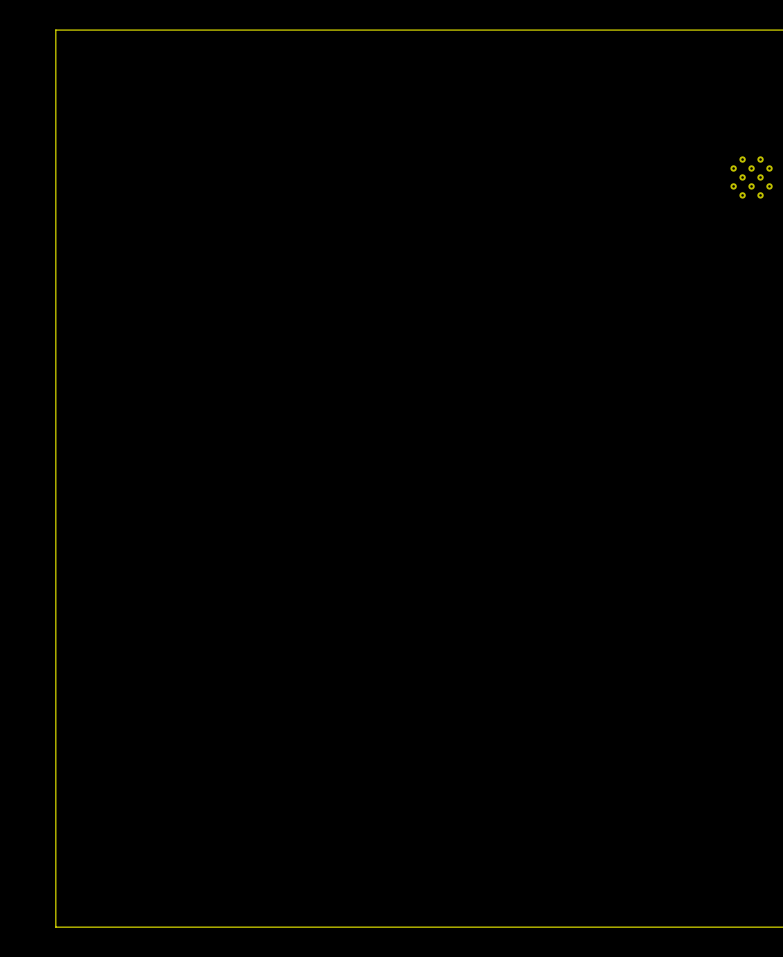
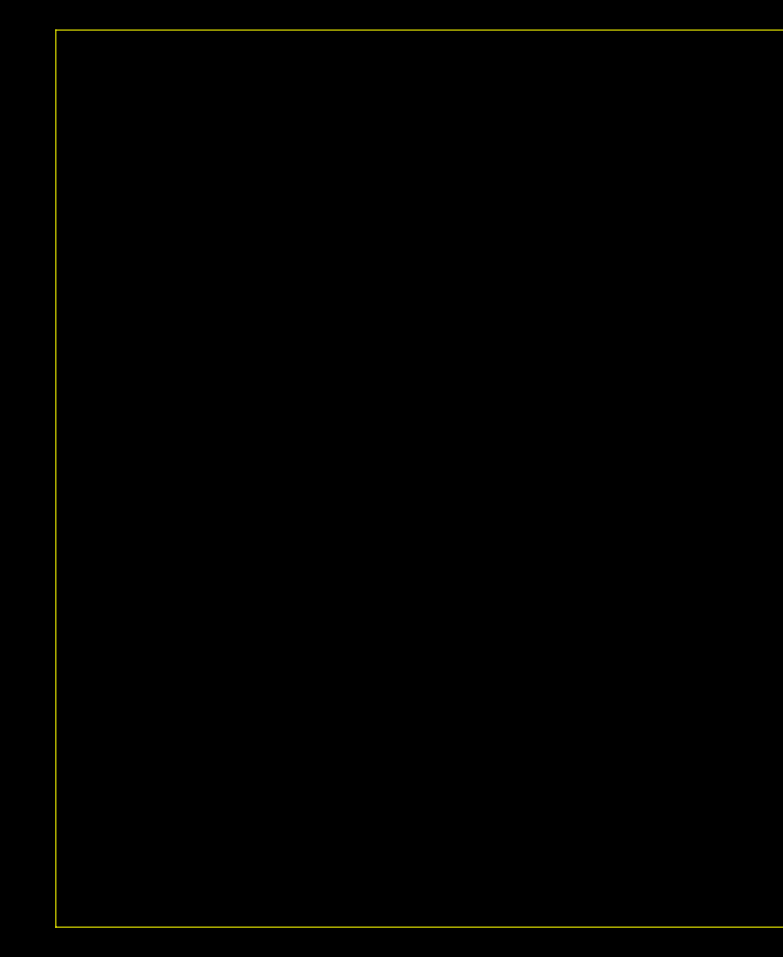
part: (751, 177) -> none

